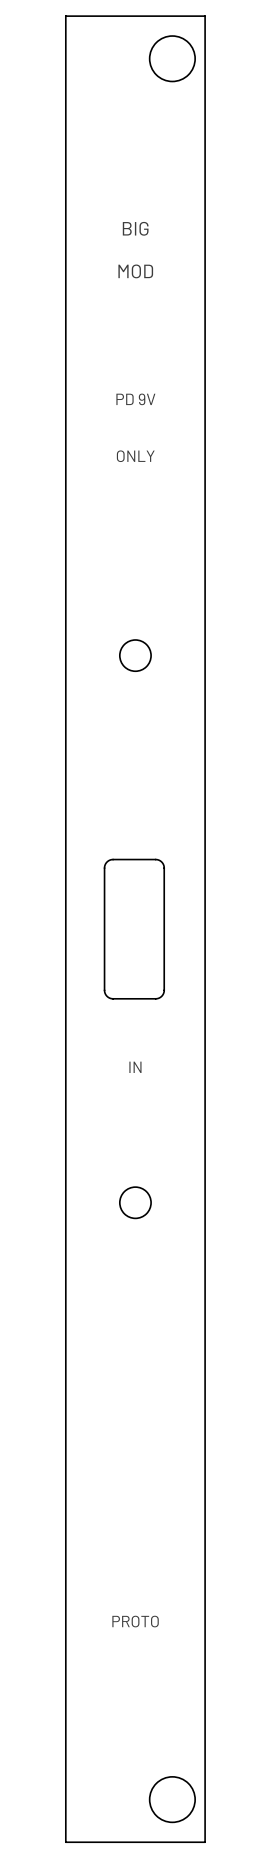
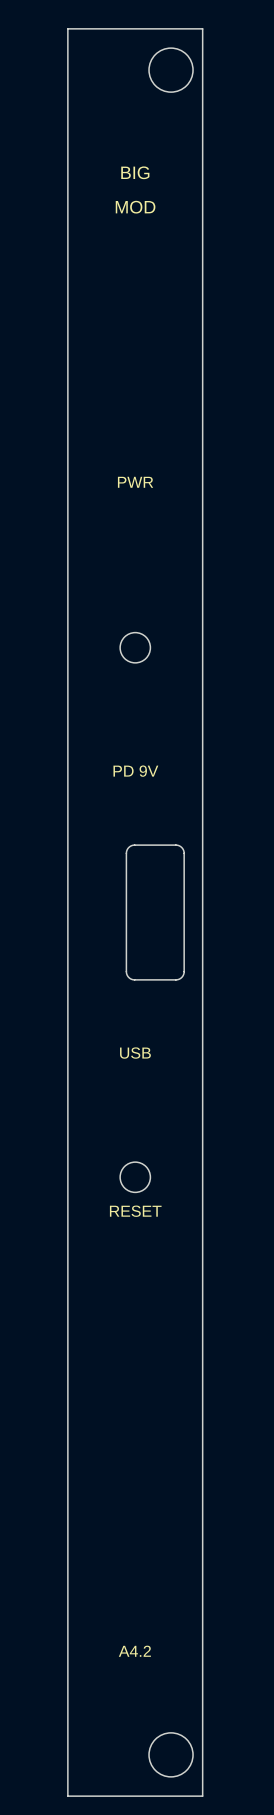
text position: BIG (135, 228) -> BIG (135, 172)
text position: MOD (135, 271) -> MOD (135, 207)
text: PD 9V (135, 399) -> none
text: ONLY (135, 456) -> none
text: none -> PWR (135, 482)
text: none -> PD 9V (135, 771)
board edge: (134, 859) (111, 859) (106, 862) (104, 868) (104, 992) (111, 998) (134, 998) -> (134, 845) (128, 847) (126, 853) (126, 972) (129, 978) (134, 979)
board edge: (155, 859) (161, 862) (164, 868) (164, 991) (161, 996) (155, 998) -> (154, 845) (177, 845) (182, 848) (184, 853) (183, 973) (177, 979) (154, 979)
text: IN (135, 1067) -> USB (135, 1053)
text: none -> RESET (135, 1211)
text: PROTO (135, 1621) -> none
text: none -> A4.2 (134, 1651)

